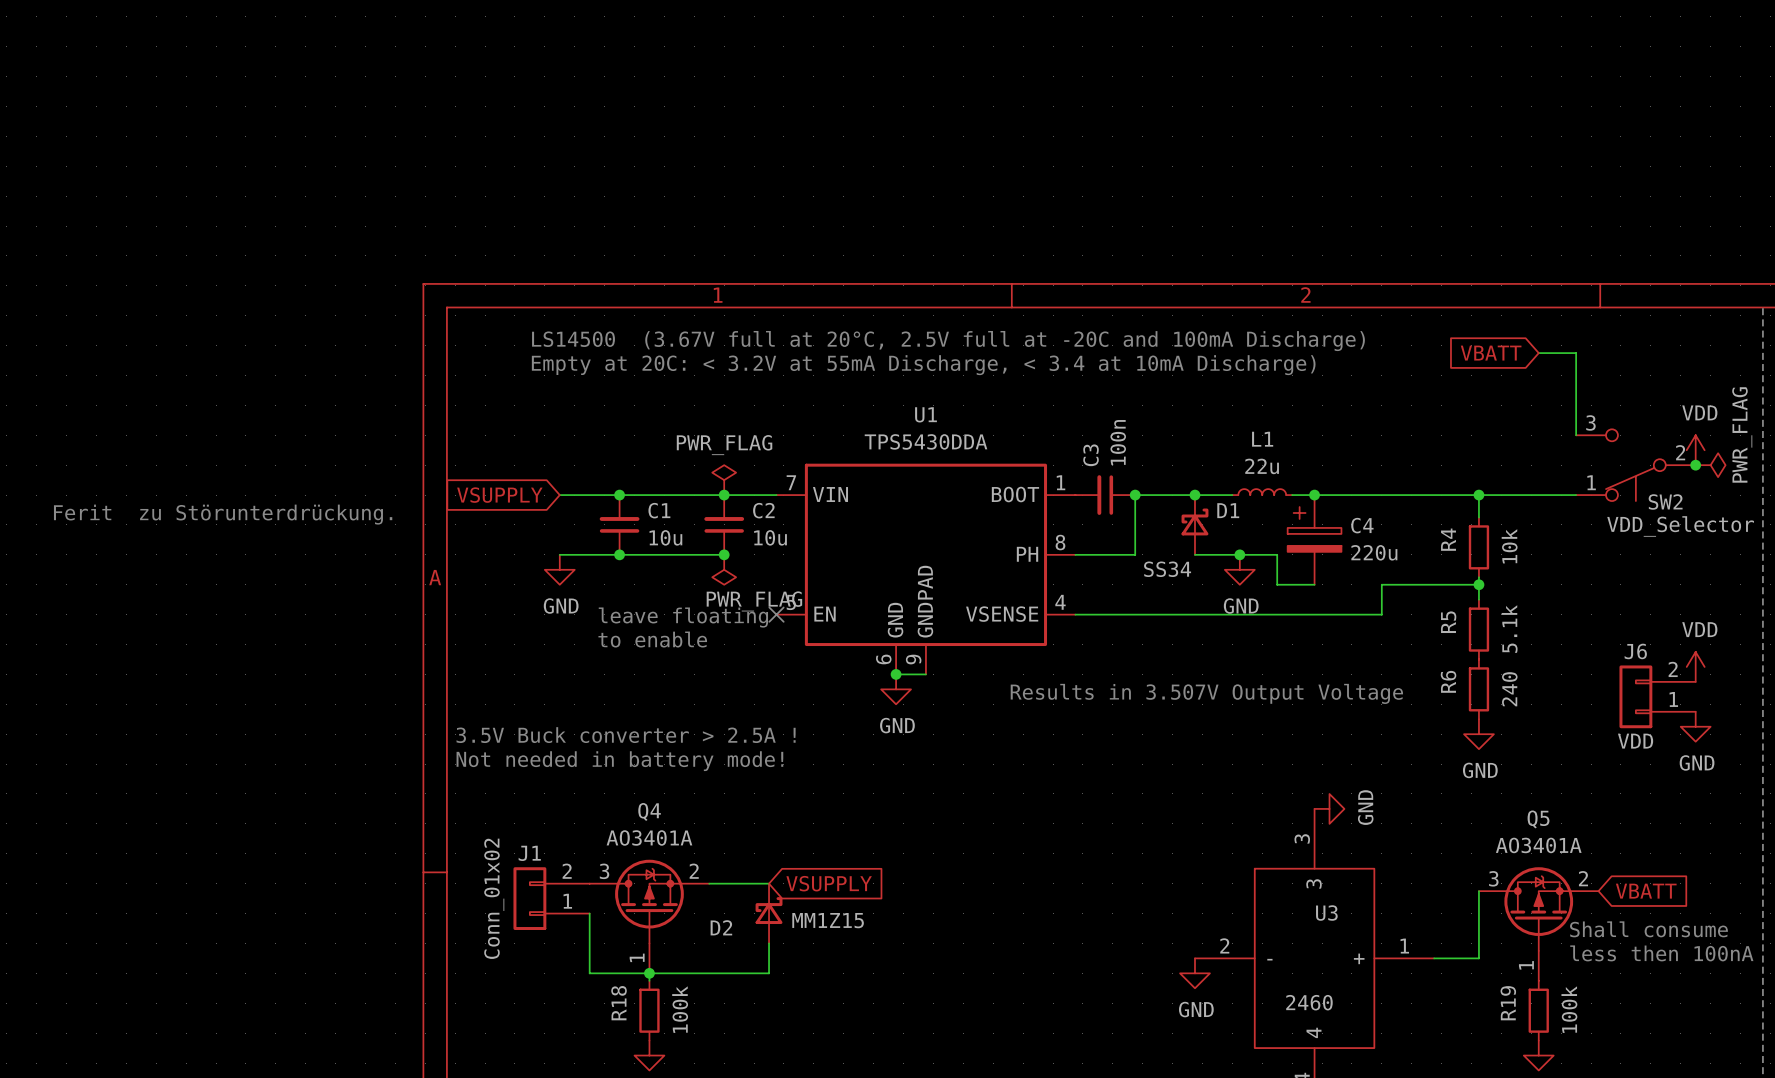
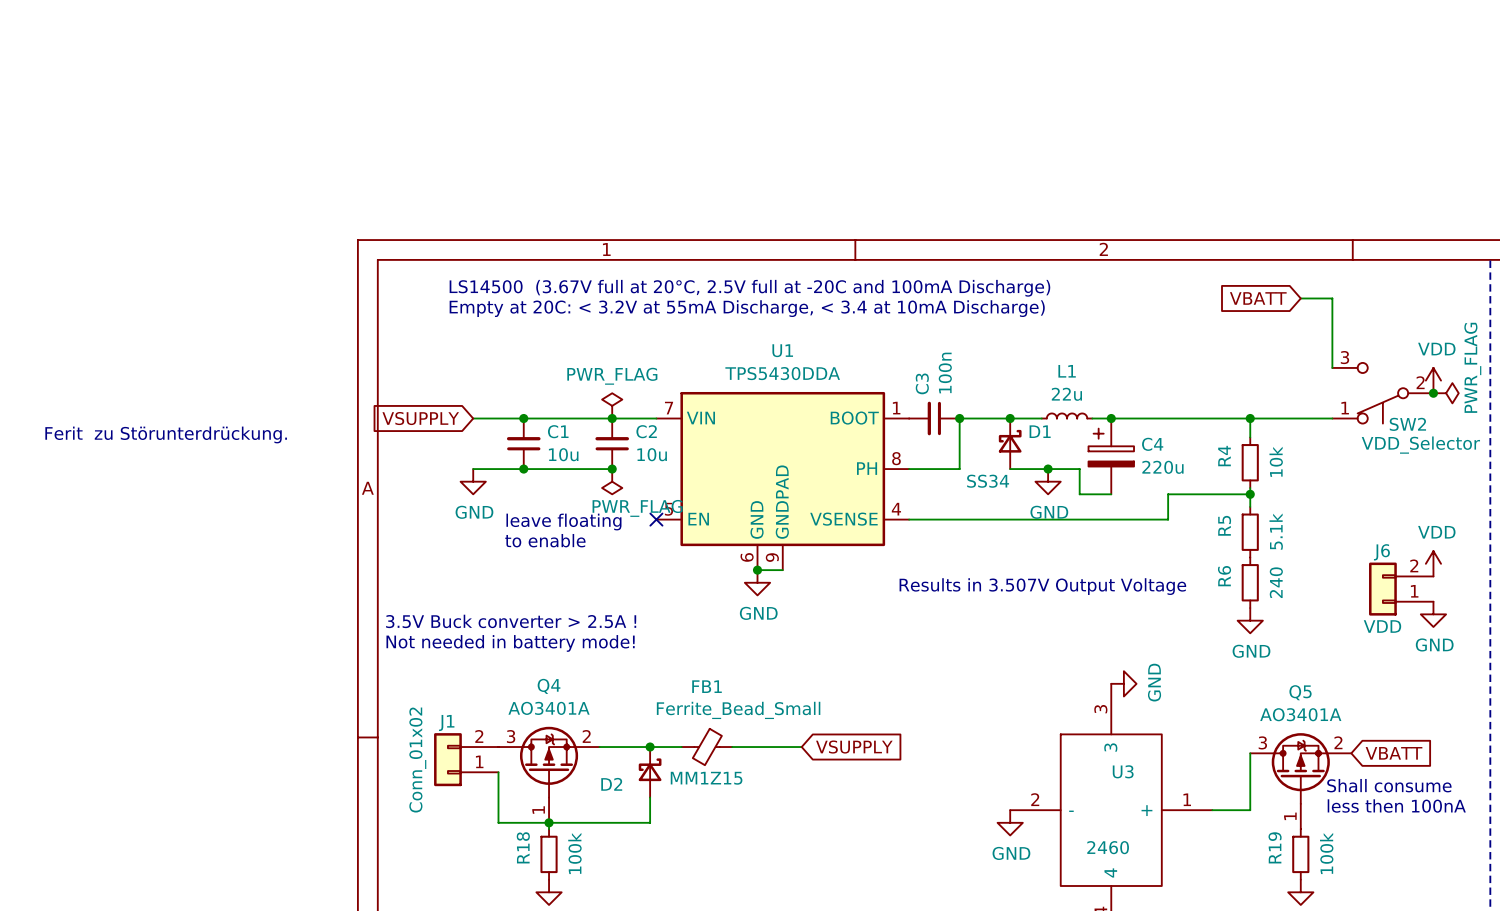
wire: none -> (650, 747) (681, 747)
junction: none -> (650, 747)
global label position: VSUPPLY (829, 883) -> VSUPPLY (854, 747)
FB1: none -> Ferrite_Bead_Small (706, 747)
wire: none -> (732, 747) (801, 747)

